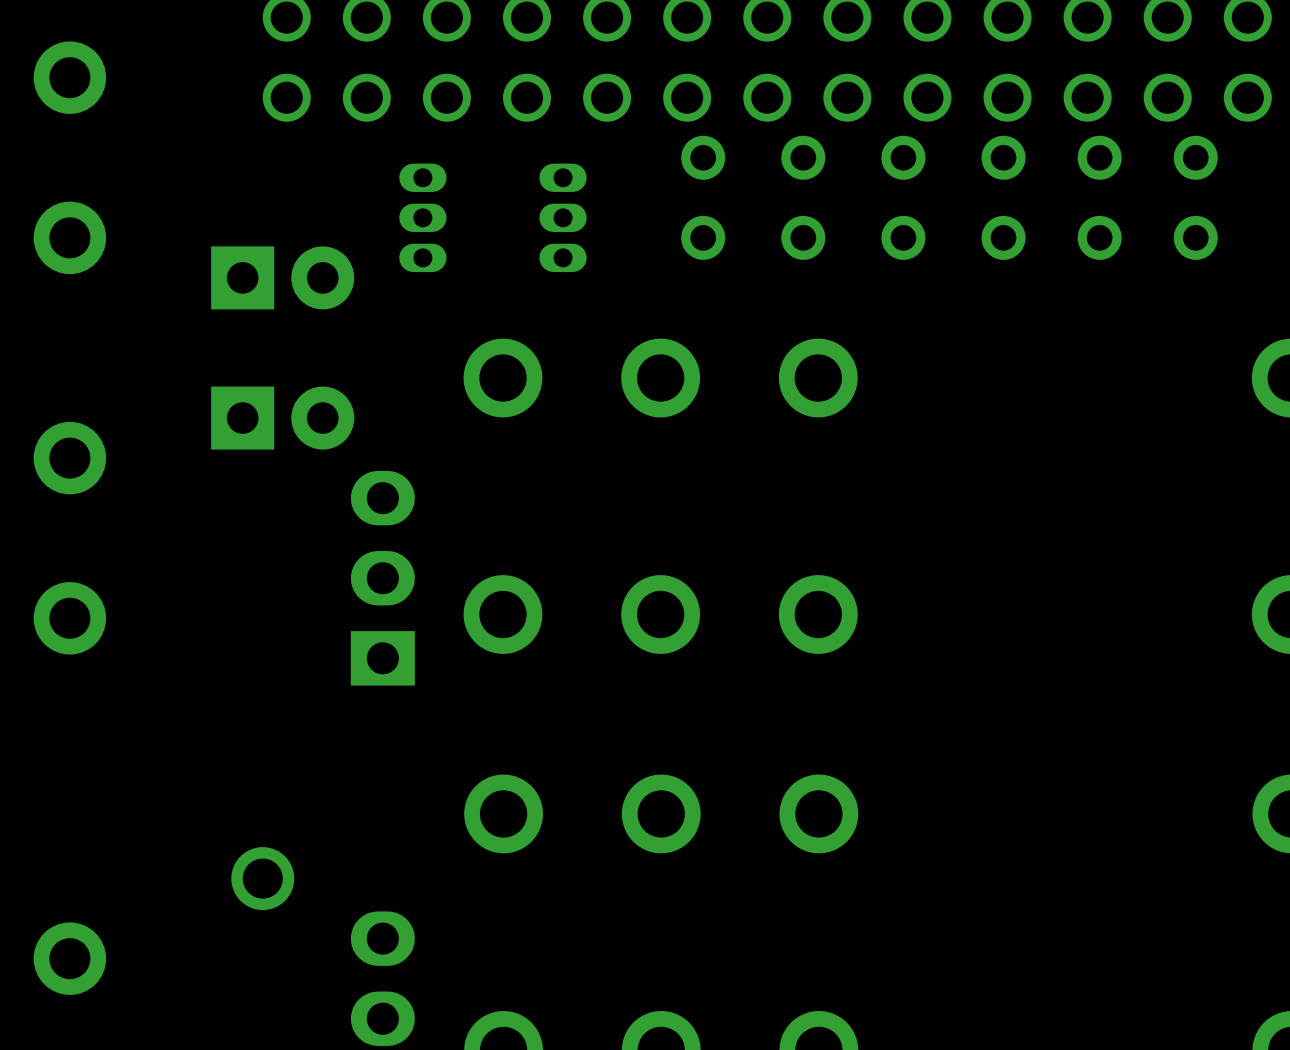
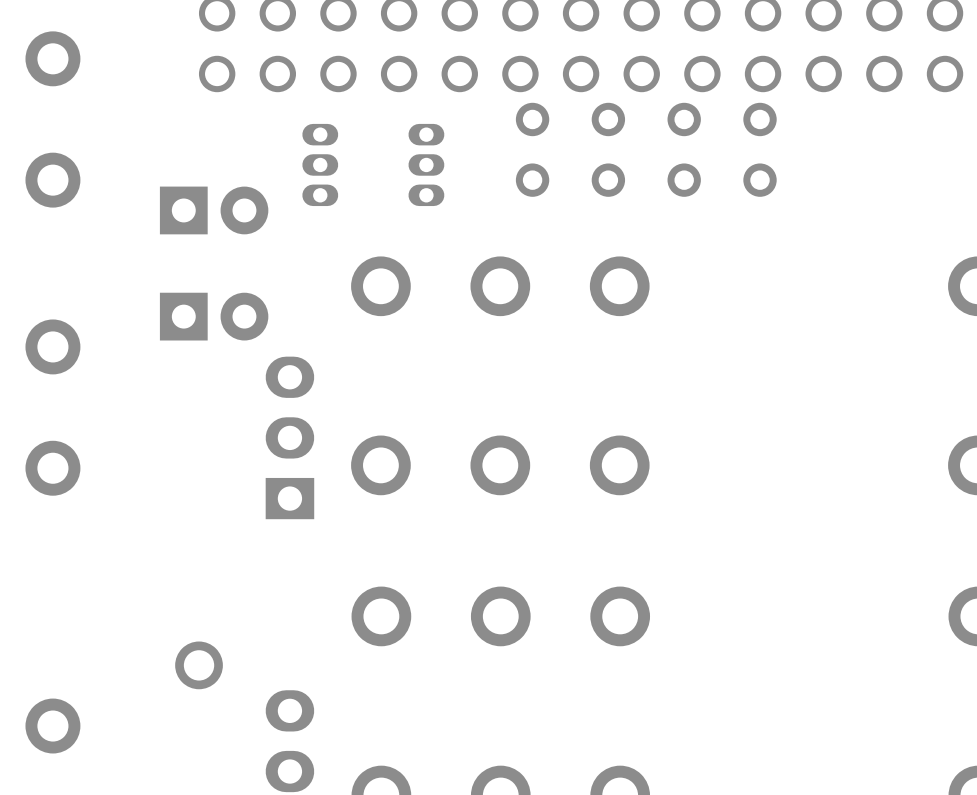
part: (1099, 197) -> none
part: (1195, 197) -> none

